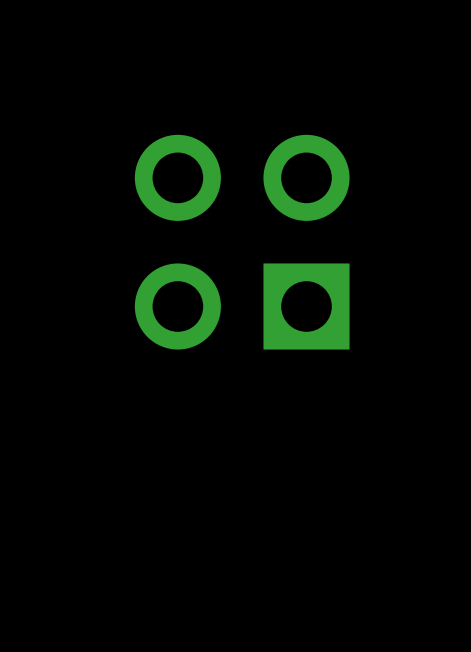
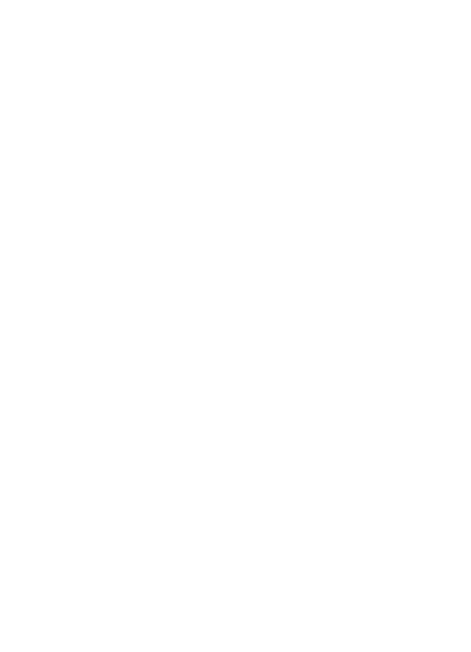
part: (242, 242) -> none

